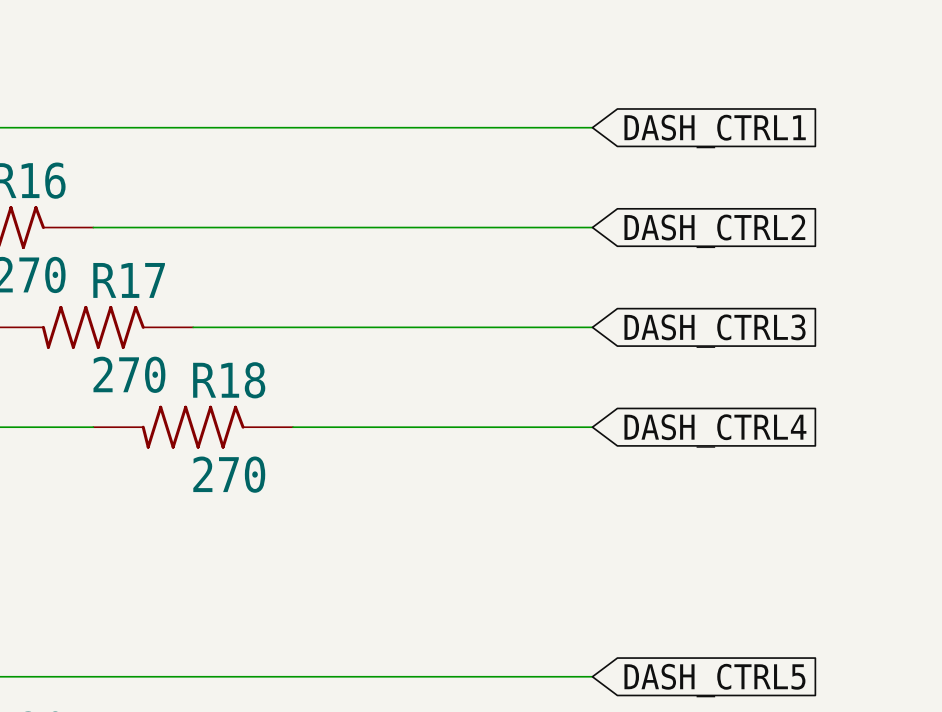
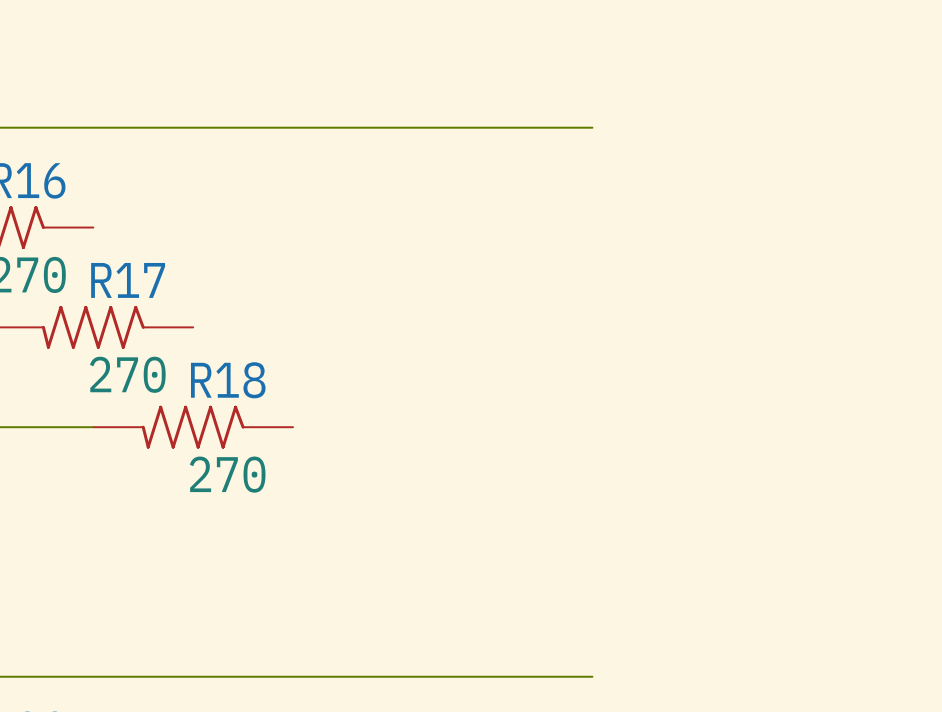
global label: DASH_CTRL1 (715, 131) -> none
wire: (93, 227) (592, 227) -> none
global label: DASH_CTRL2 (714, 231) -> none
wire: (193, 327) (592, 327) -> none
global label: DASH_CTRL3 (715, 331) -> none
wire: (292, 427) (592, 427) -> none
global label: DASH_CTRL4 (715, 431) -> none
global label: DASH_CTRL5 (714, 680) -> none

